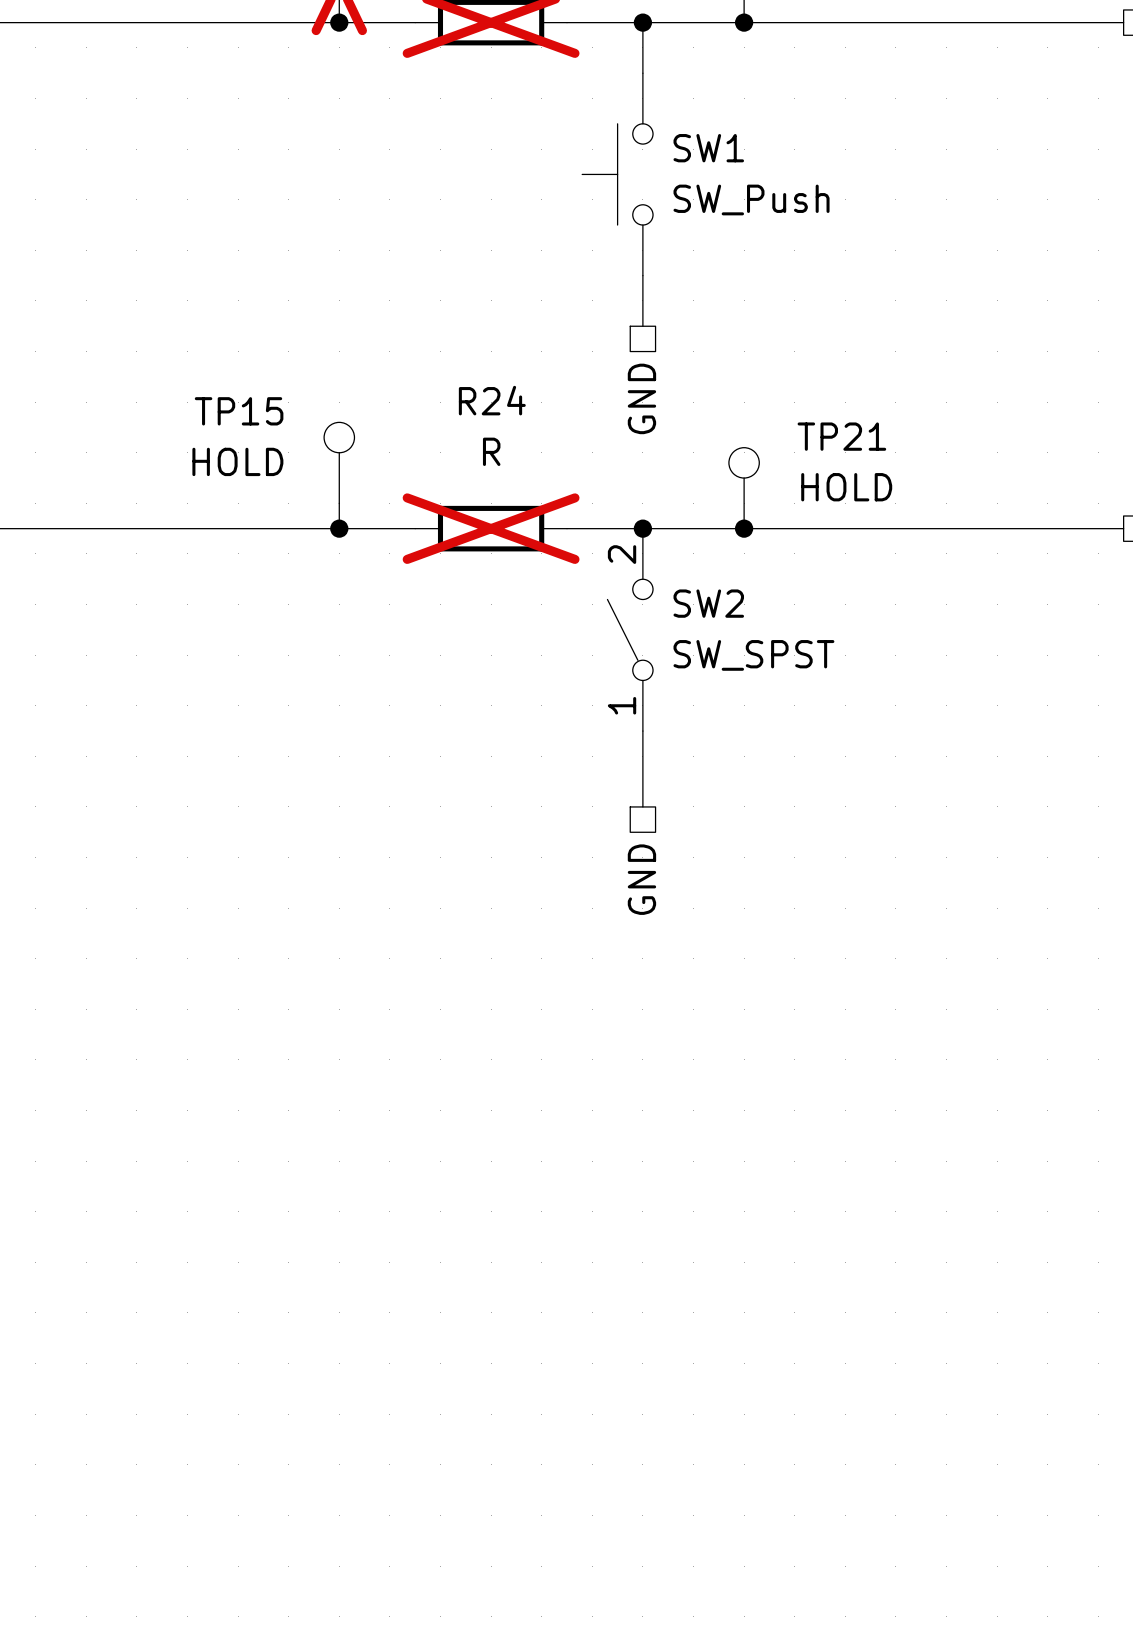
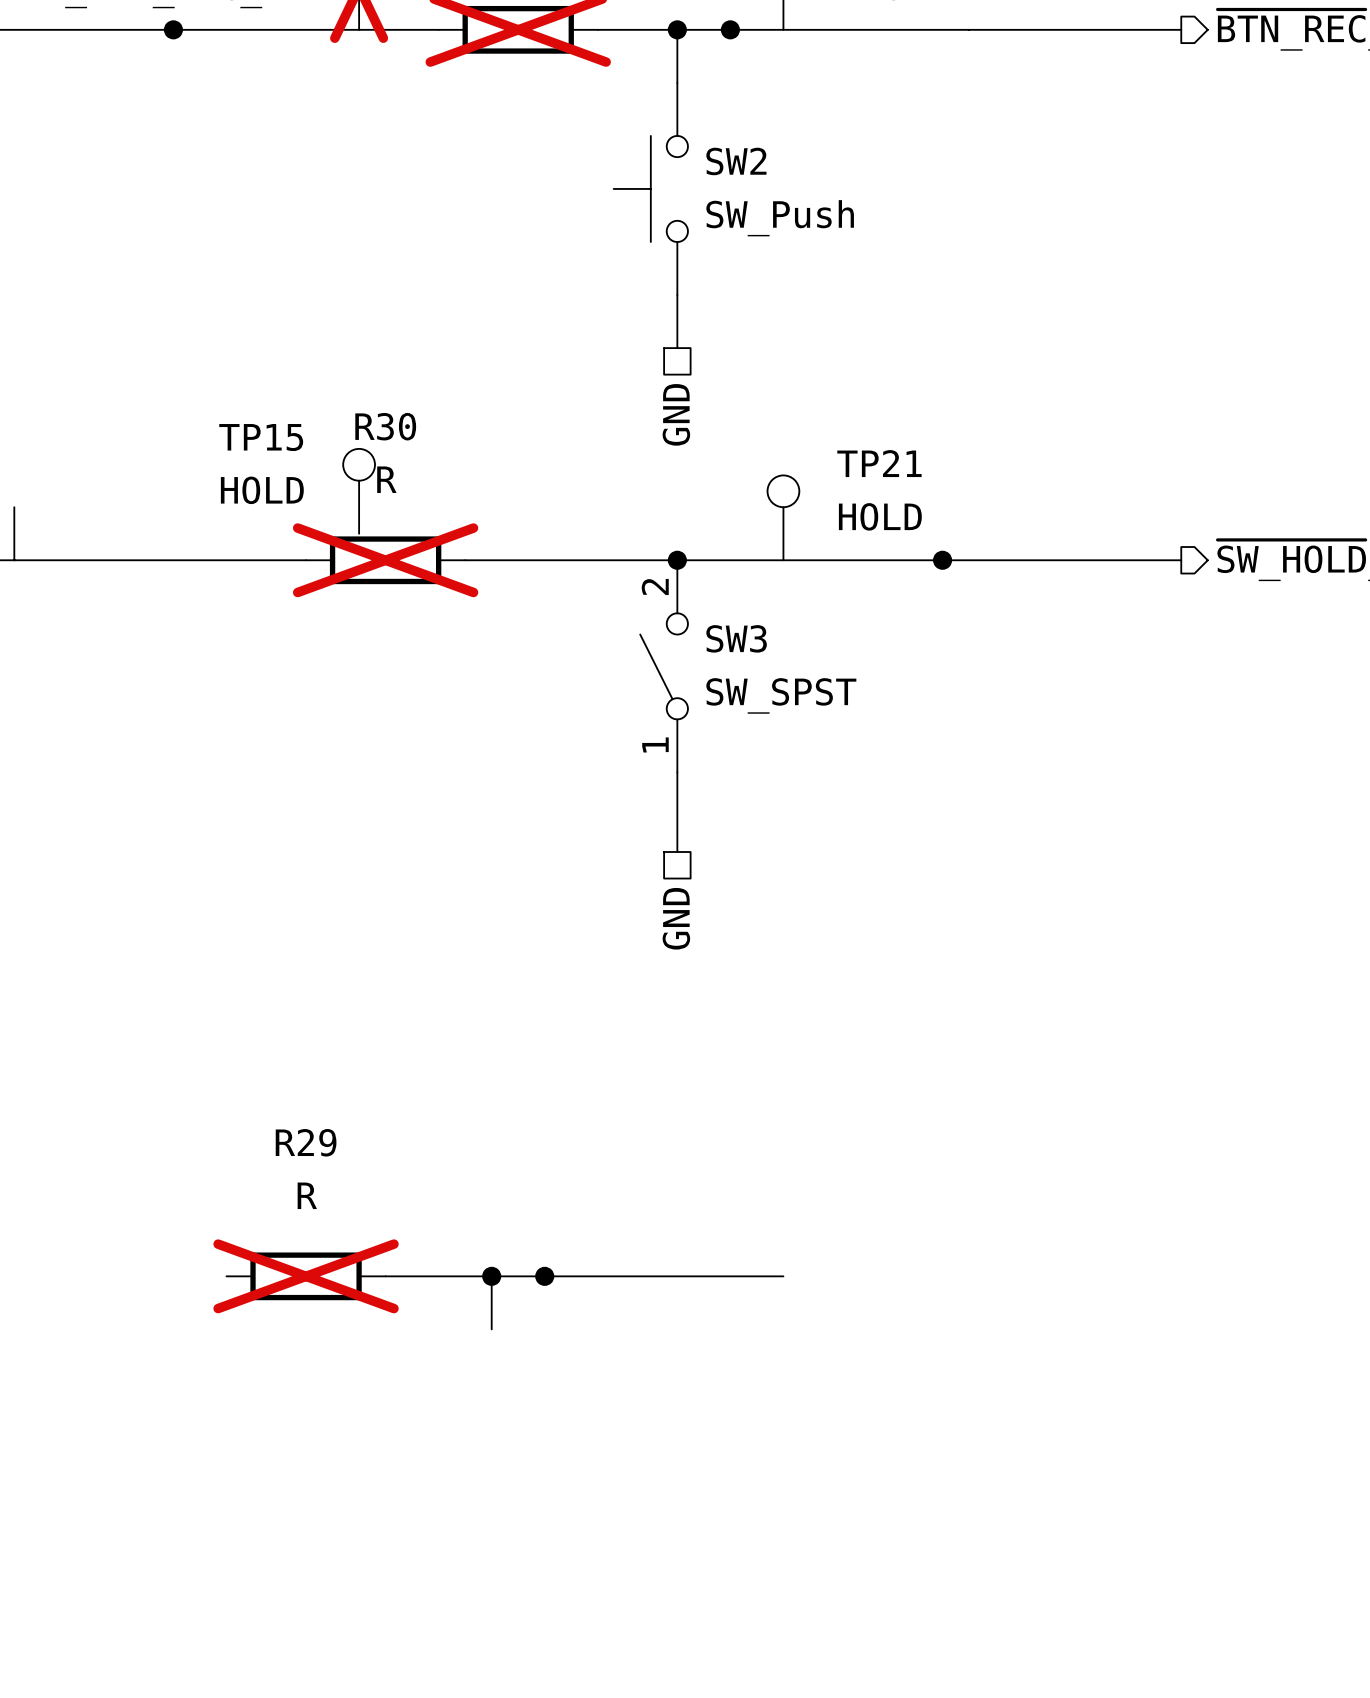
junction: none -> (173, 29)
junction: (339, 22) -> none
junction position: (744, 22) -> (730, 29)
SW1 name: SW1 (708, 148) -> SW2 (736, 161)
wire: none -> (14, 507) (14, 560)
wire: (288, 528) (415, 528) -> (465, 560) (597, 560)
junction: (339, 528) -> none
R30: none -> R (385, 560)
R24: R (491, 528) -> none
junction: (744, 528) -> none
junction: none -> (942, 560)
SW2 name: SW2 (708, 603) -> SW3 (736, 638)
R29: none -> R (306, 1276)
wire: none -> (385, 1276) (783, 1276)
wire: none -> (491, 1276) (491, 1329)
junction: none -> (491, 1276)
junction: none -> (544, 1276)

